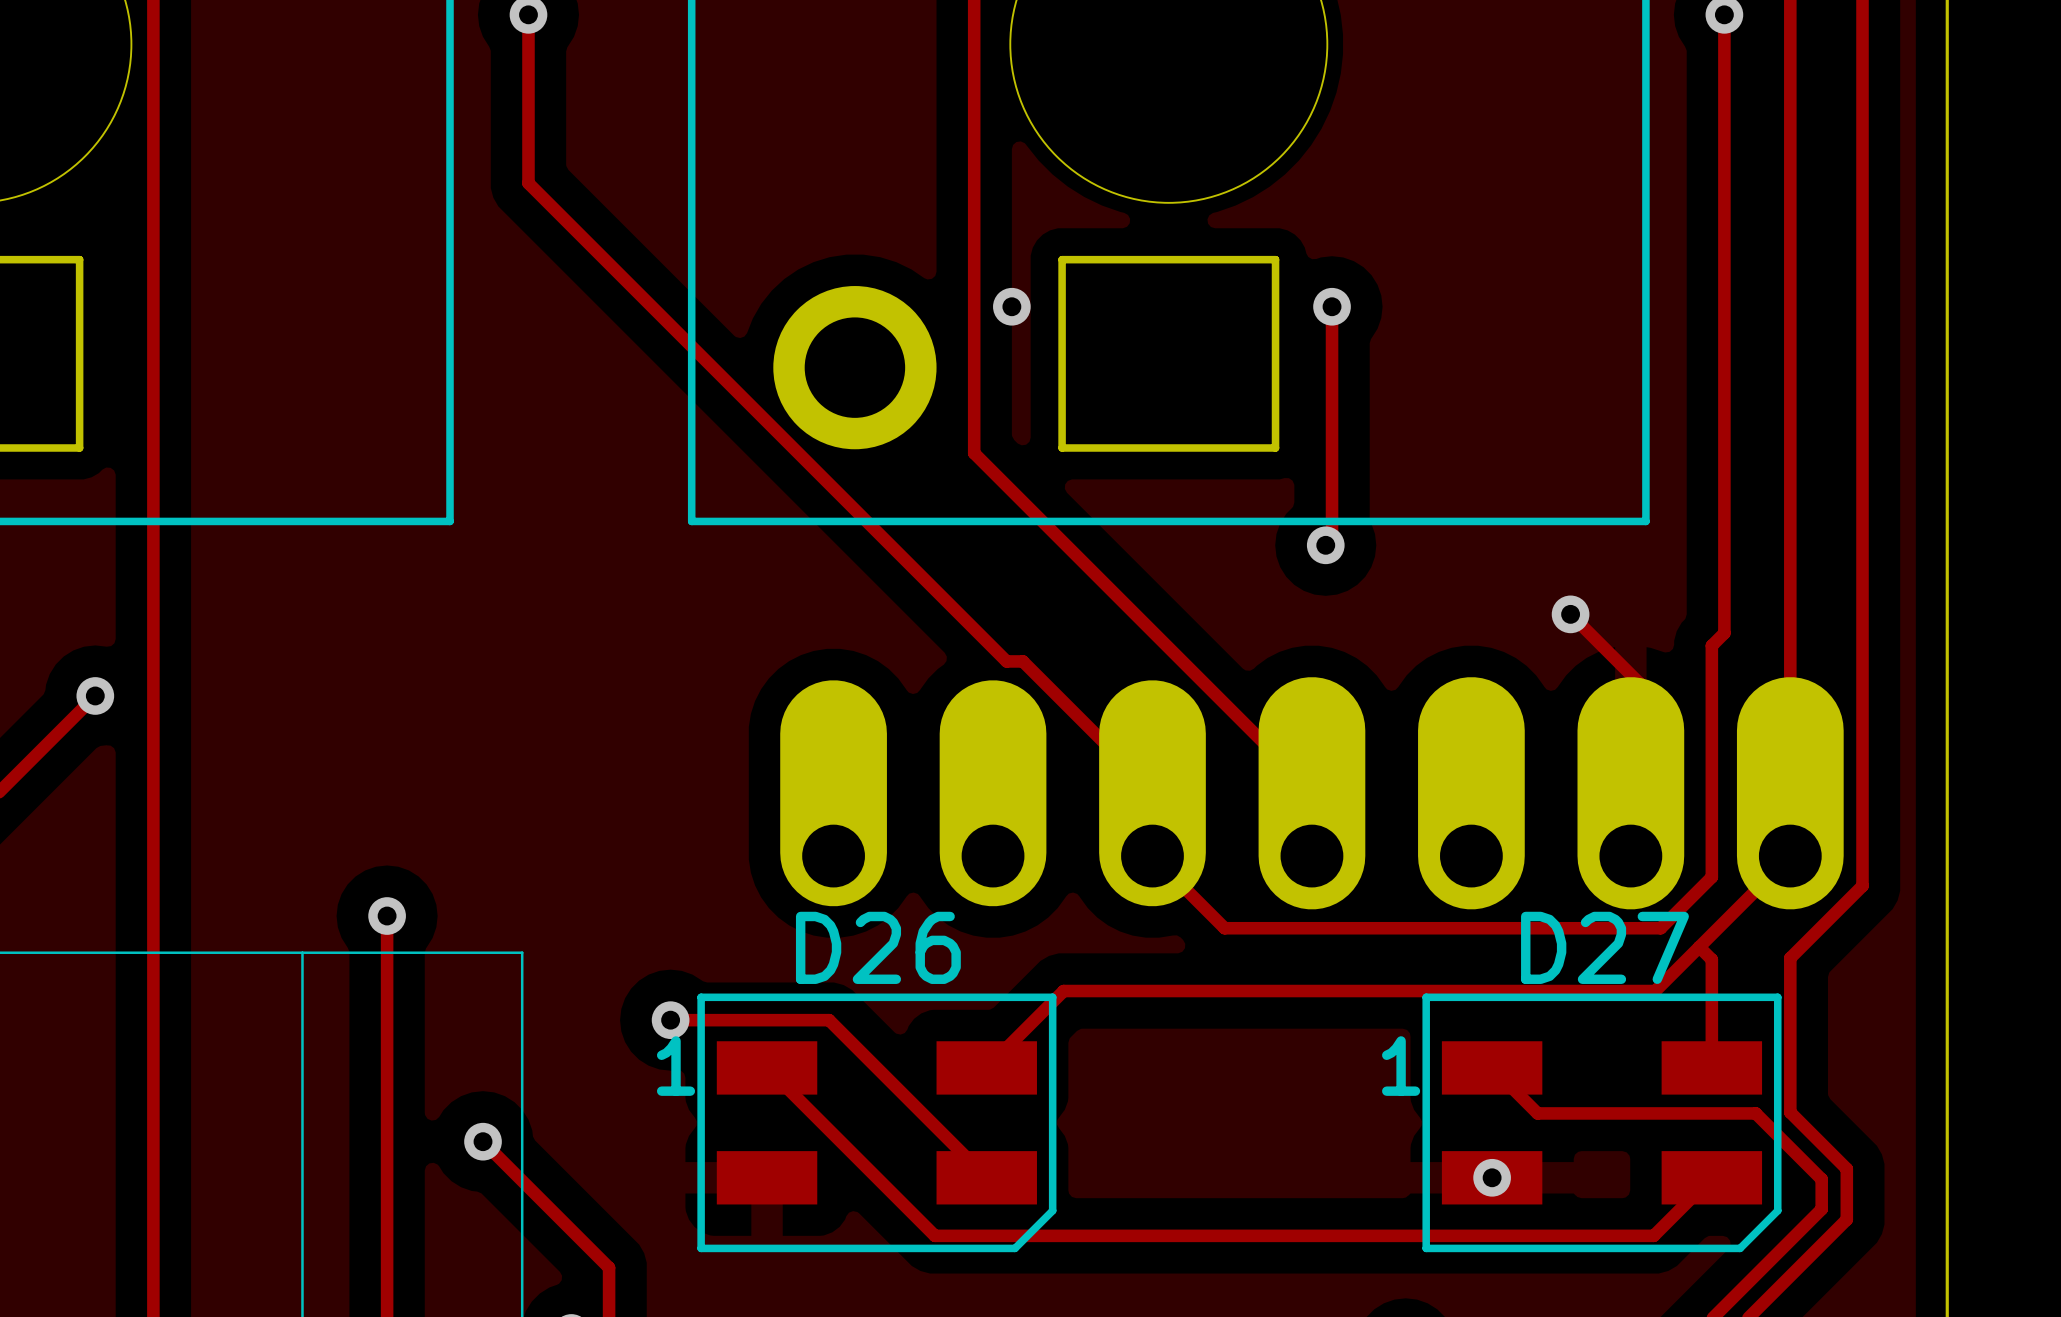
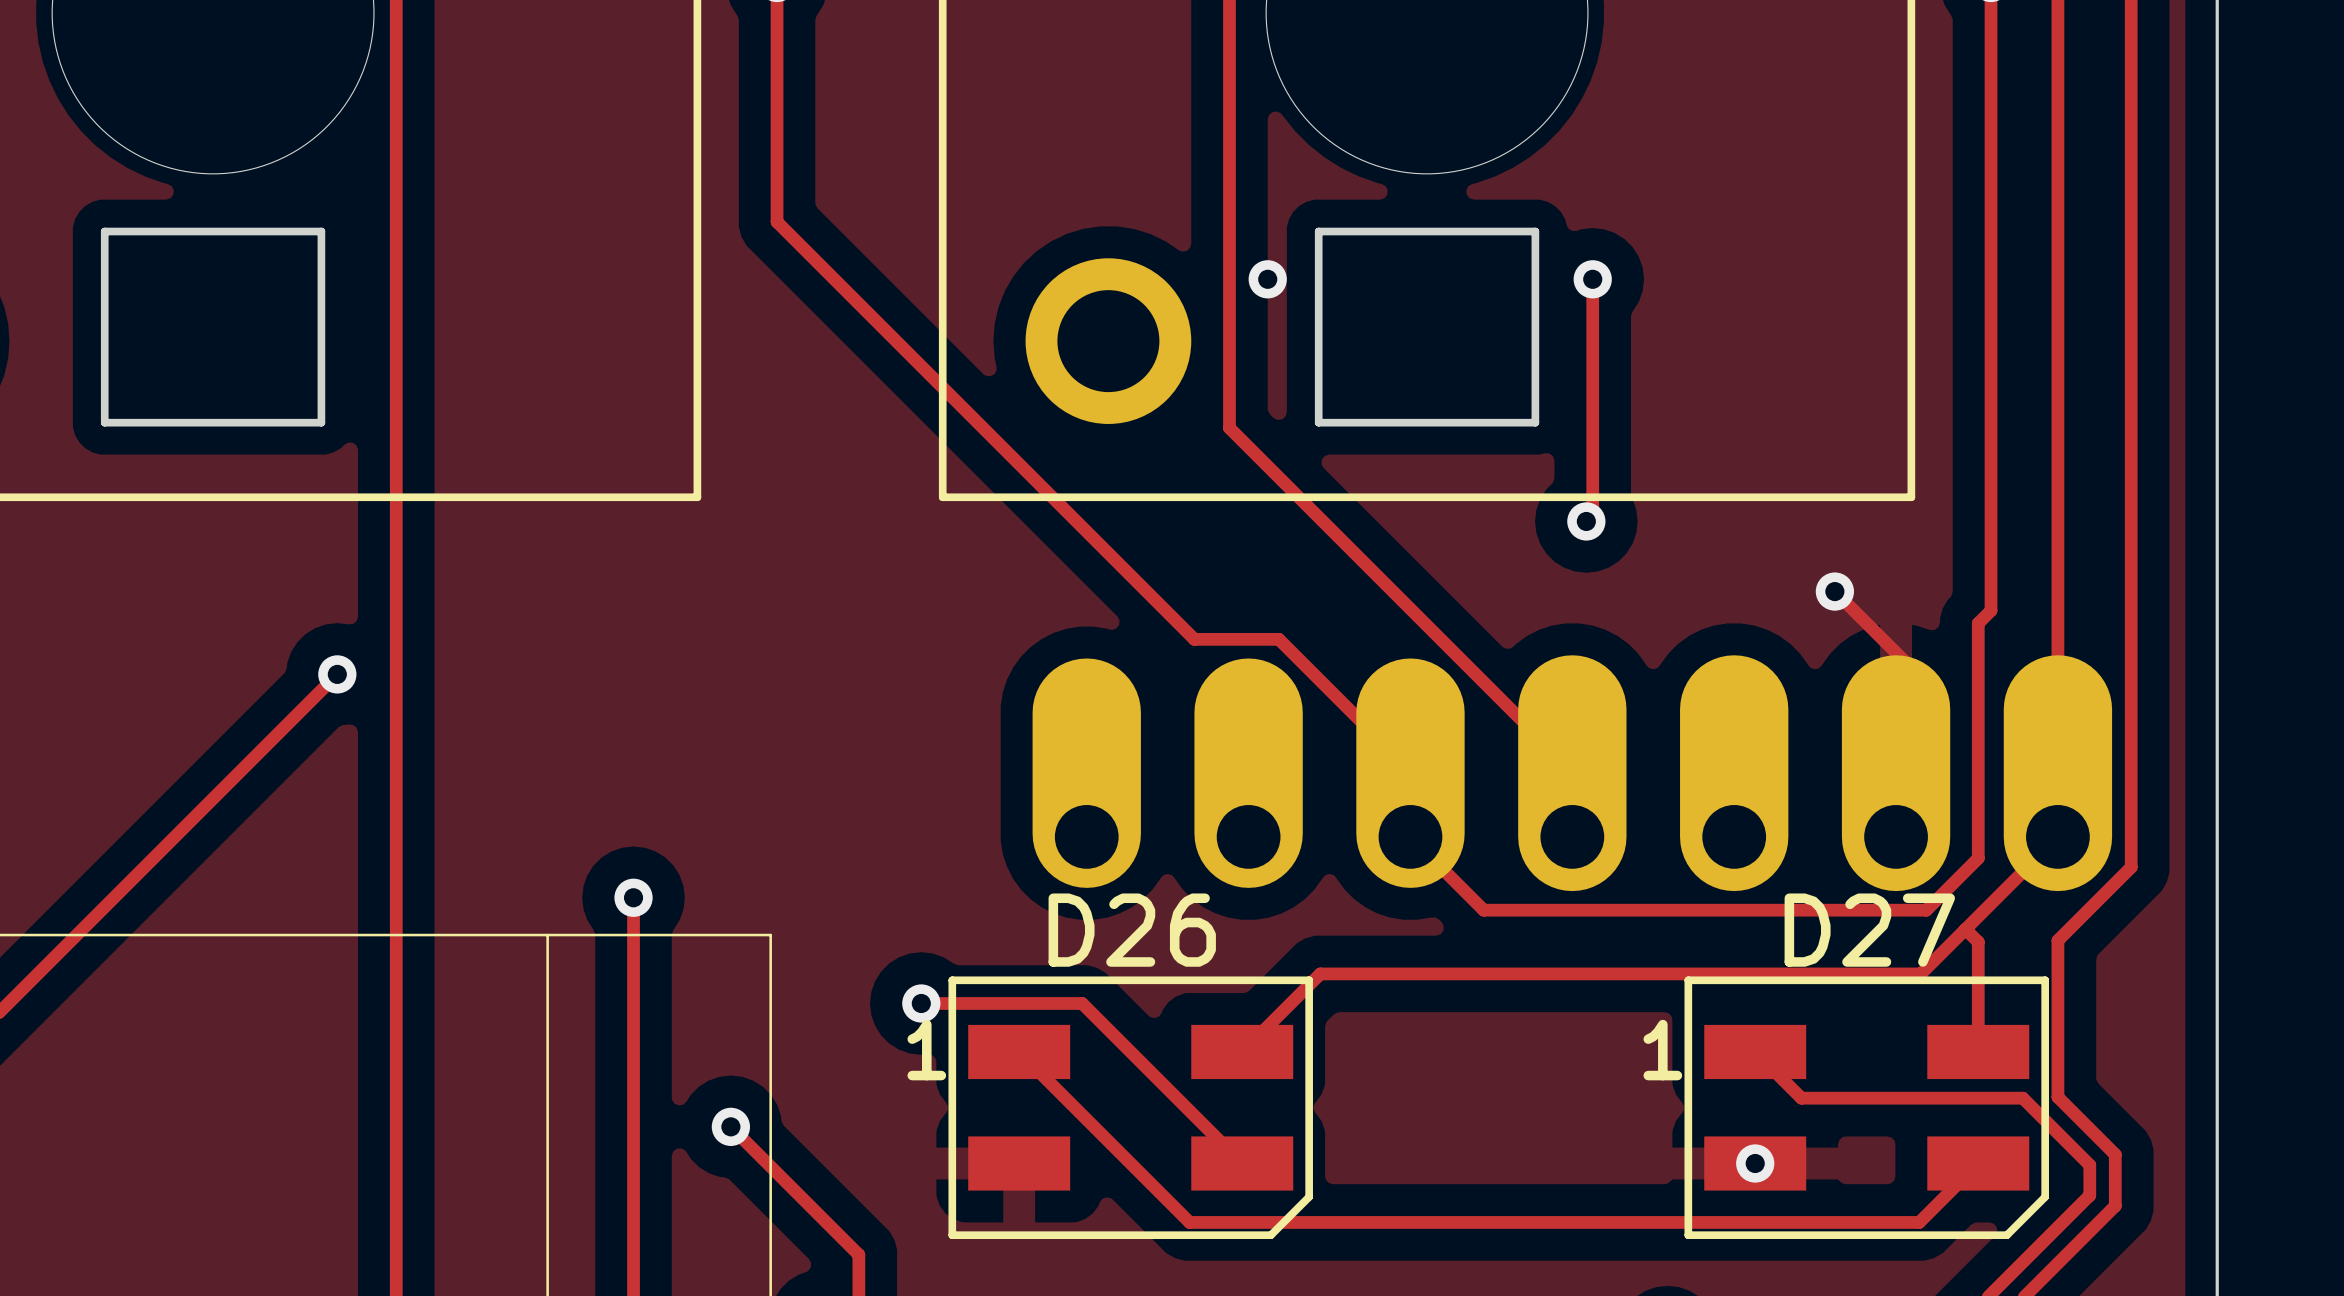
track: (528, 183) (1006, 661) -> (777, 153) (777, 221) (1194, 639) (1262, 639)

